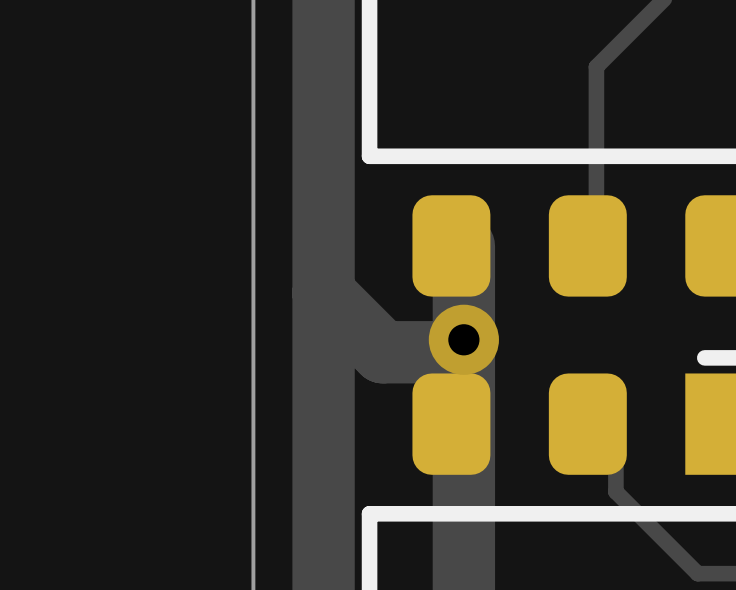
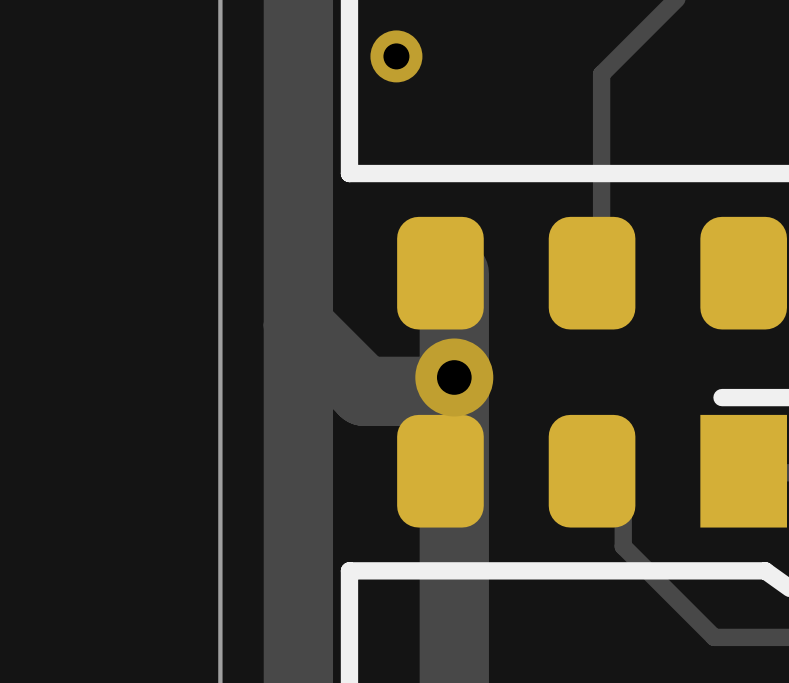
via: none -> (396, 56)

